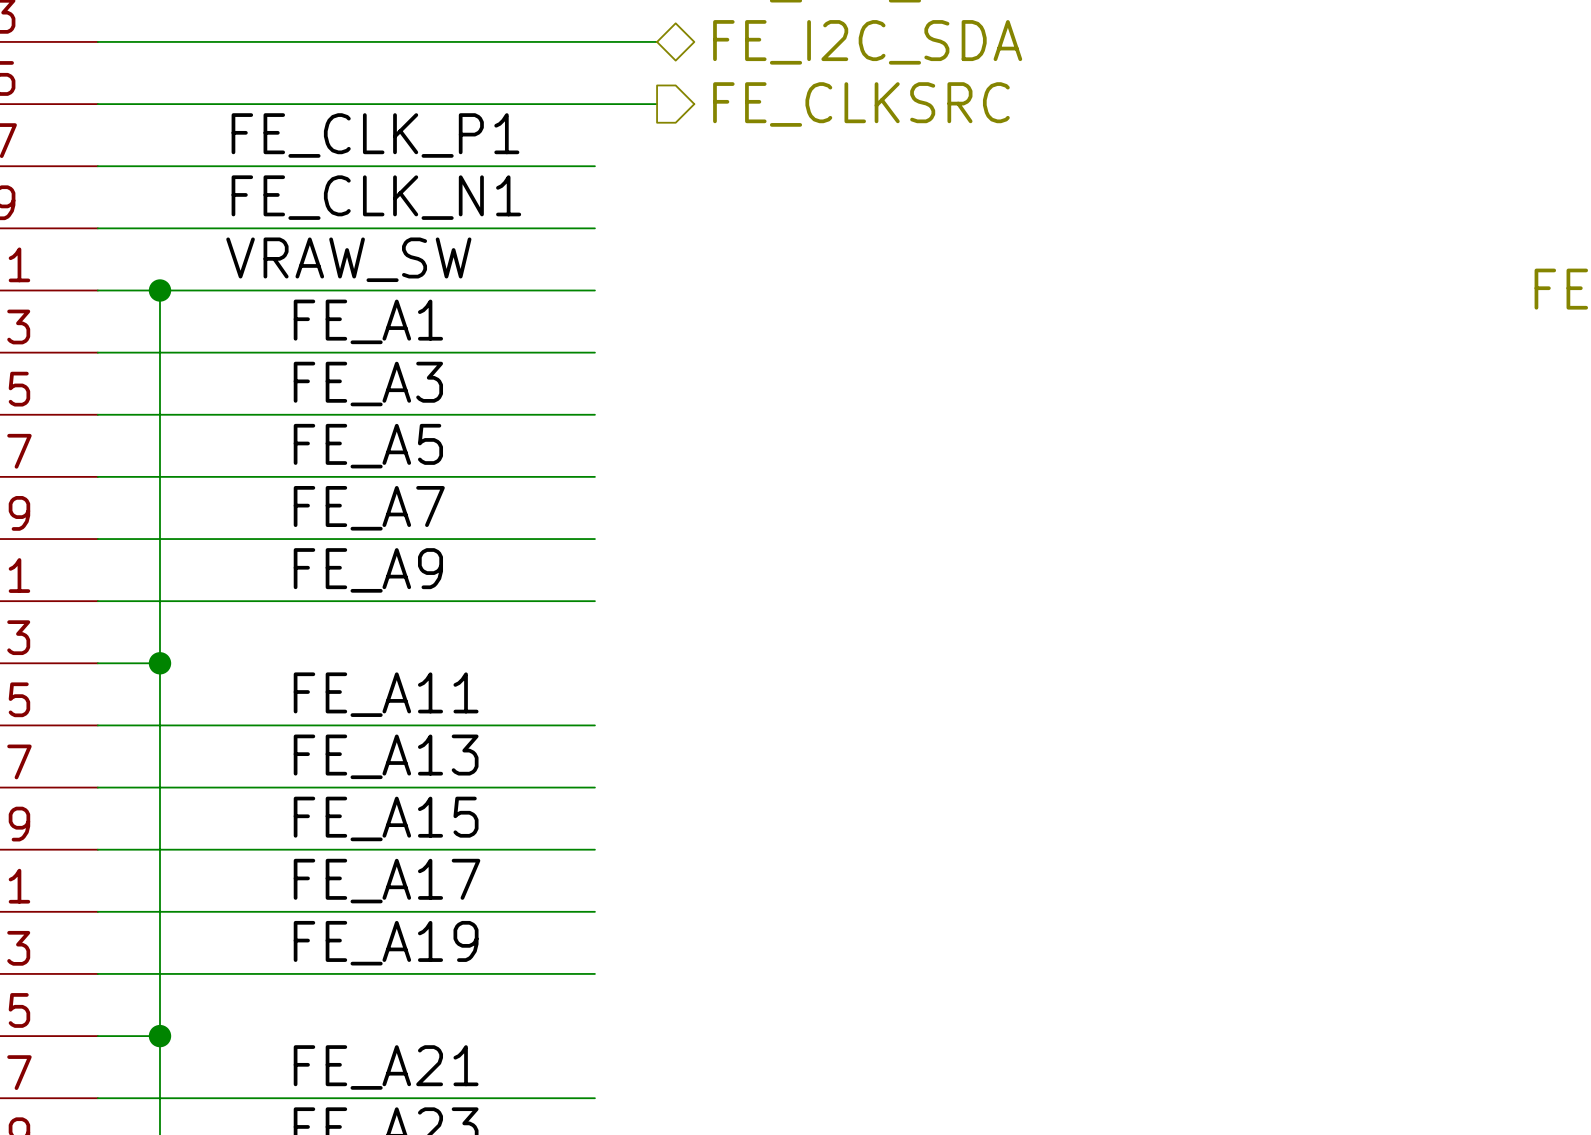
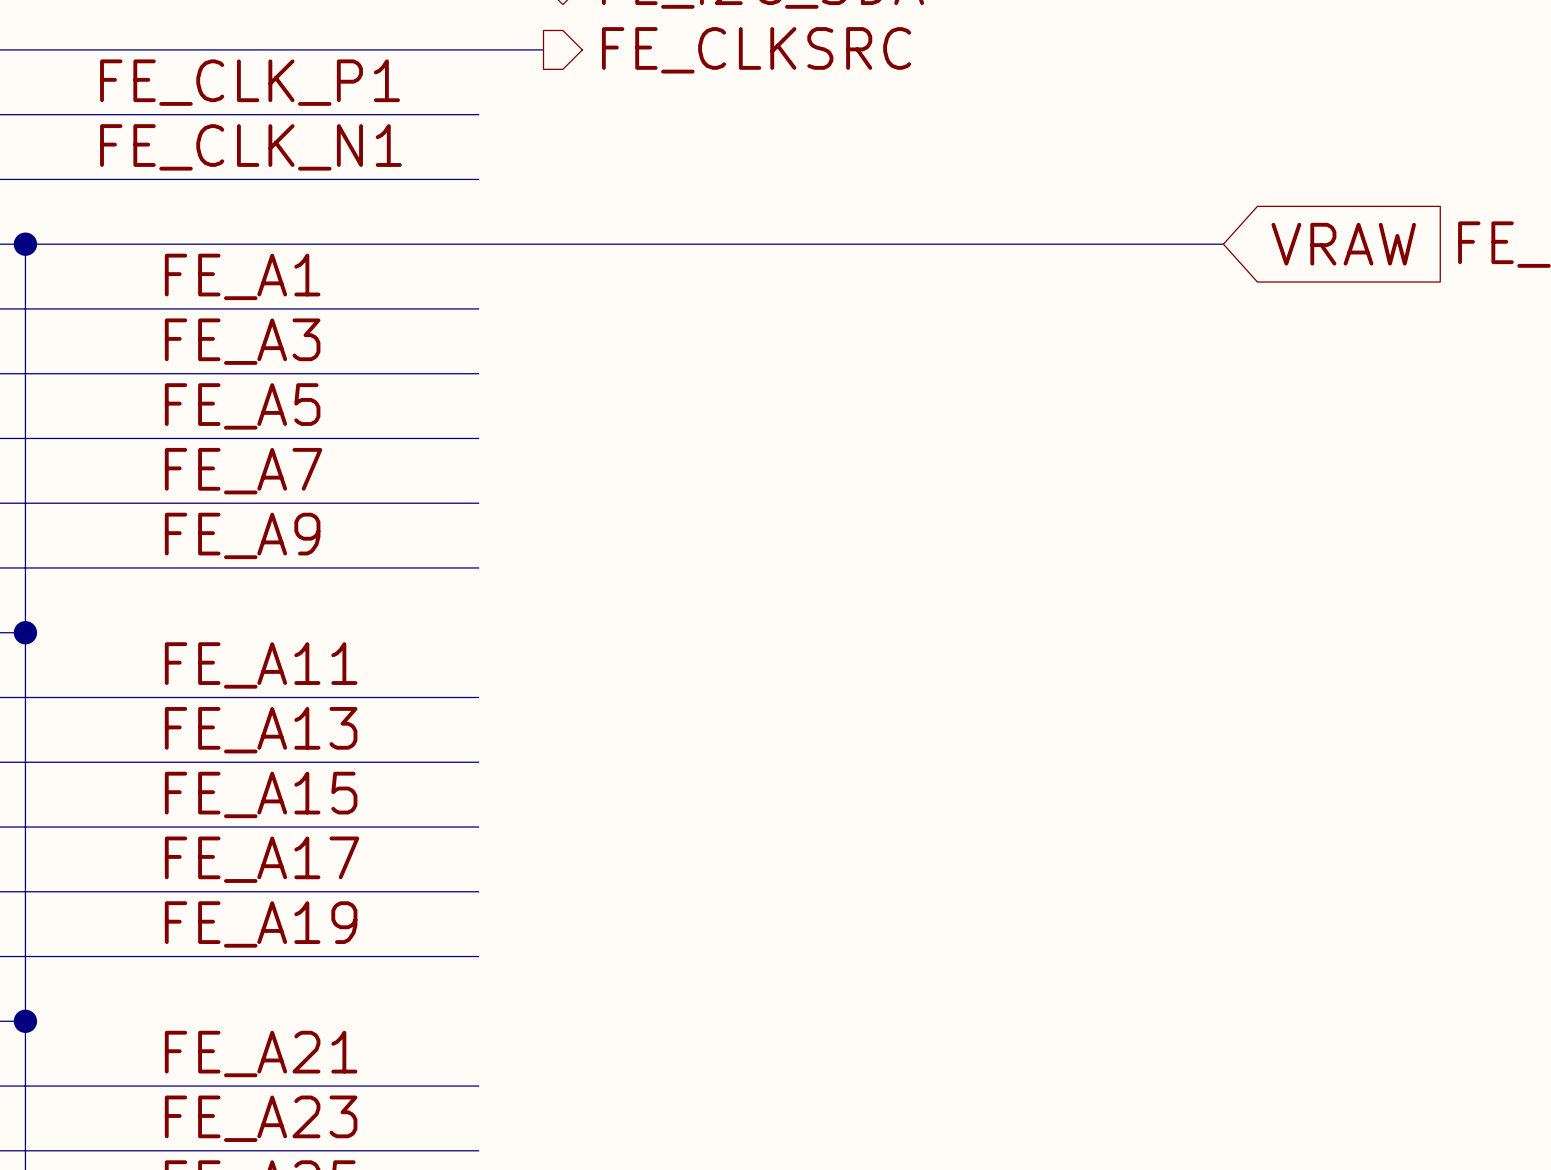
label: VRAW_SW (348, 259) -> none
wire: none -> (478, 244) (1223, 244)
global label: none -> VRAW (1343, 244)

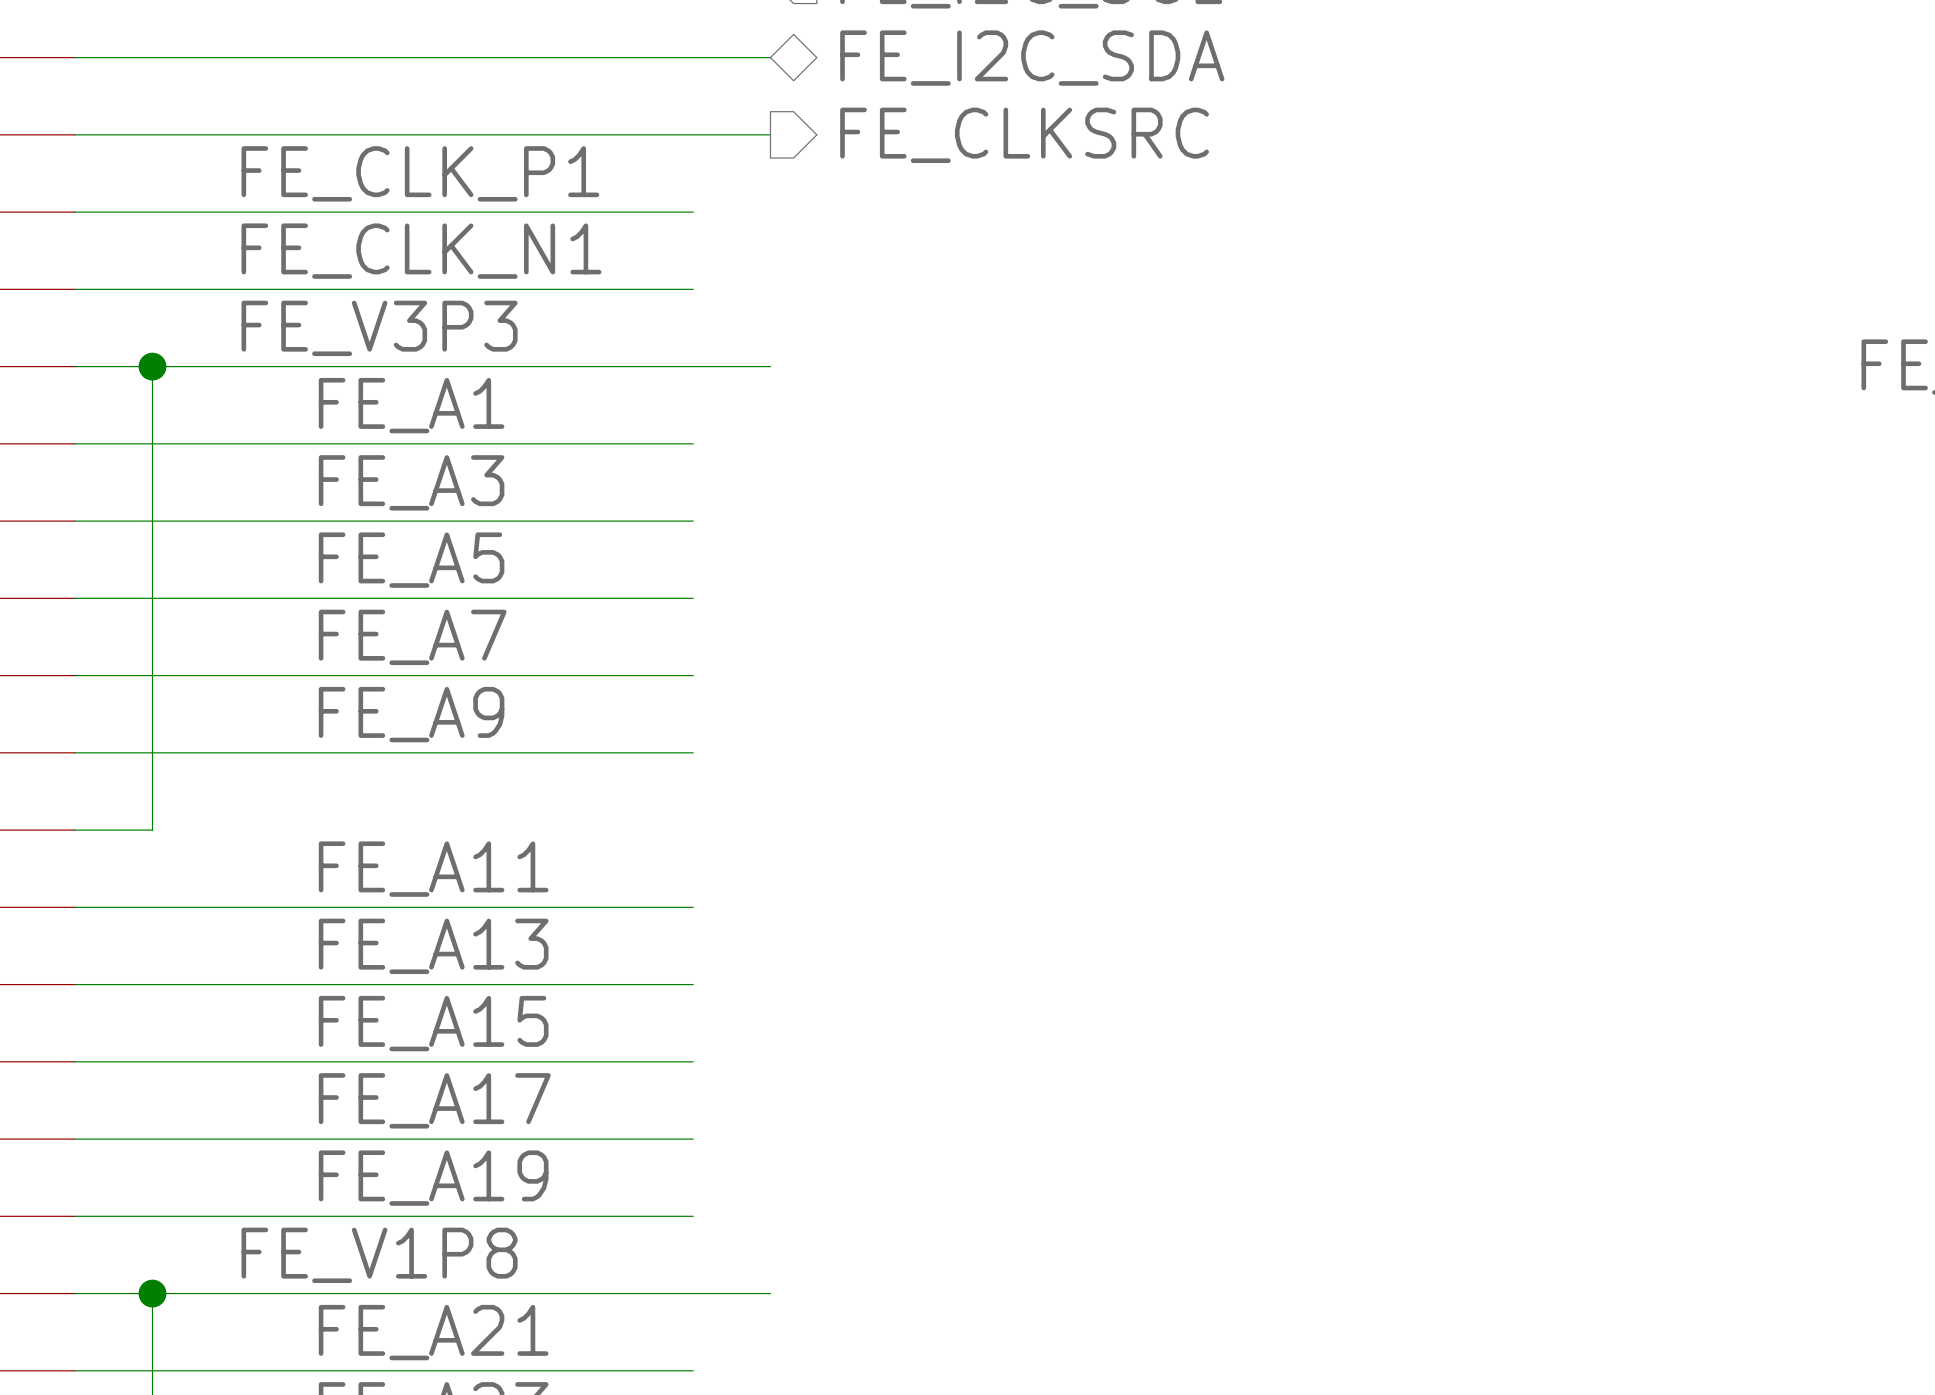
label: none -> FE_V3P3 (379, 328)
wire: (543, 244) (1223, 244) -> none
global label: VRAW (1343, 244) -> none
wire: (25, 632) (25, 1021) -> (770, 1293) (152, 1293)
junction: (25, 632) -> none
label: none -> FE_V1P8 (379, 1255)

